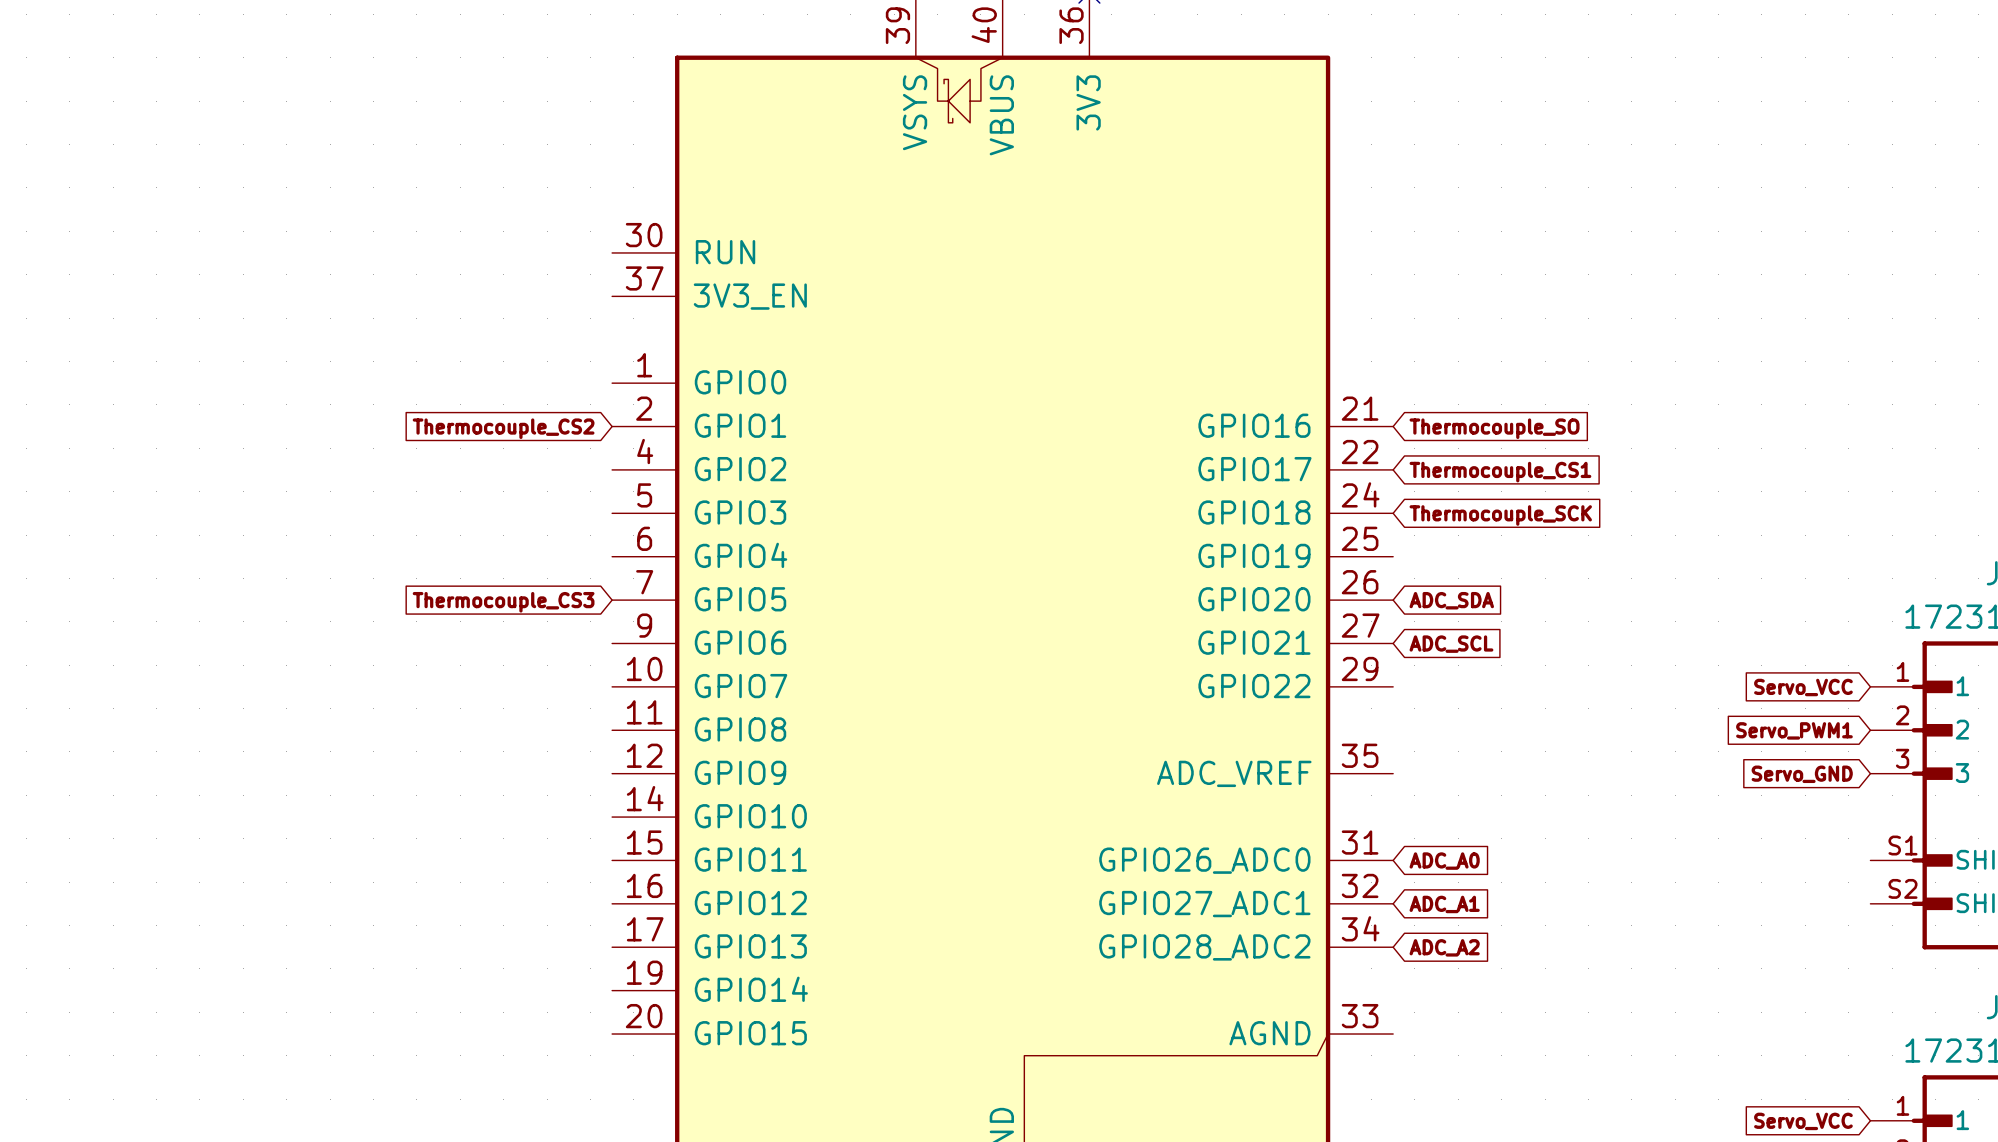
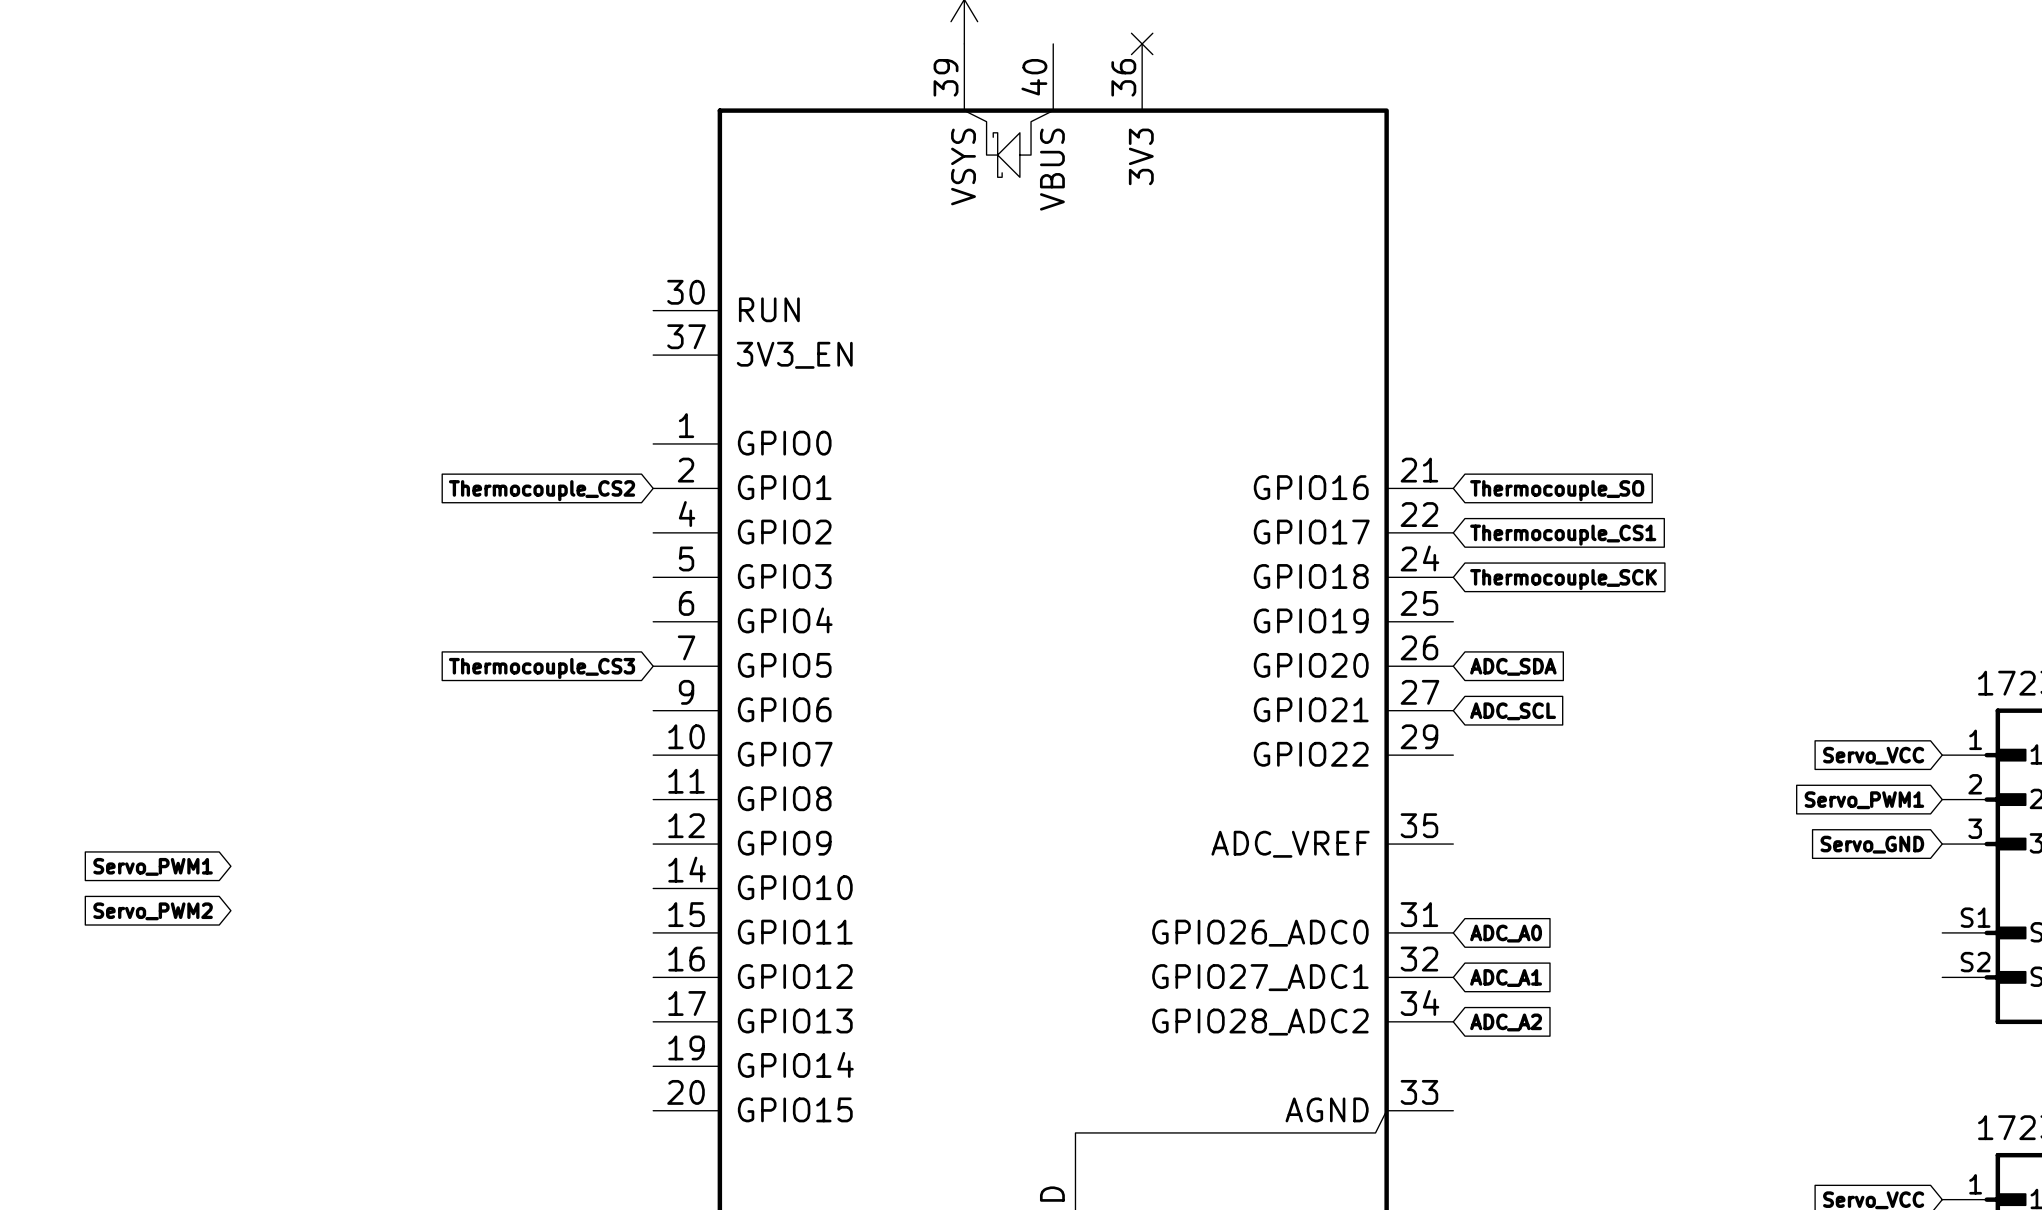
global label: none -> Servo_PWM1 (153, 866)
global label: none -> Servo_PWM2 (153, 911)

